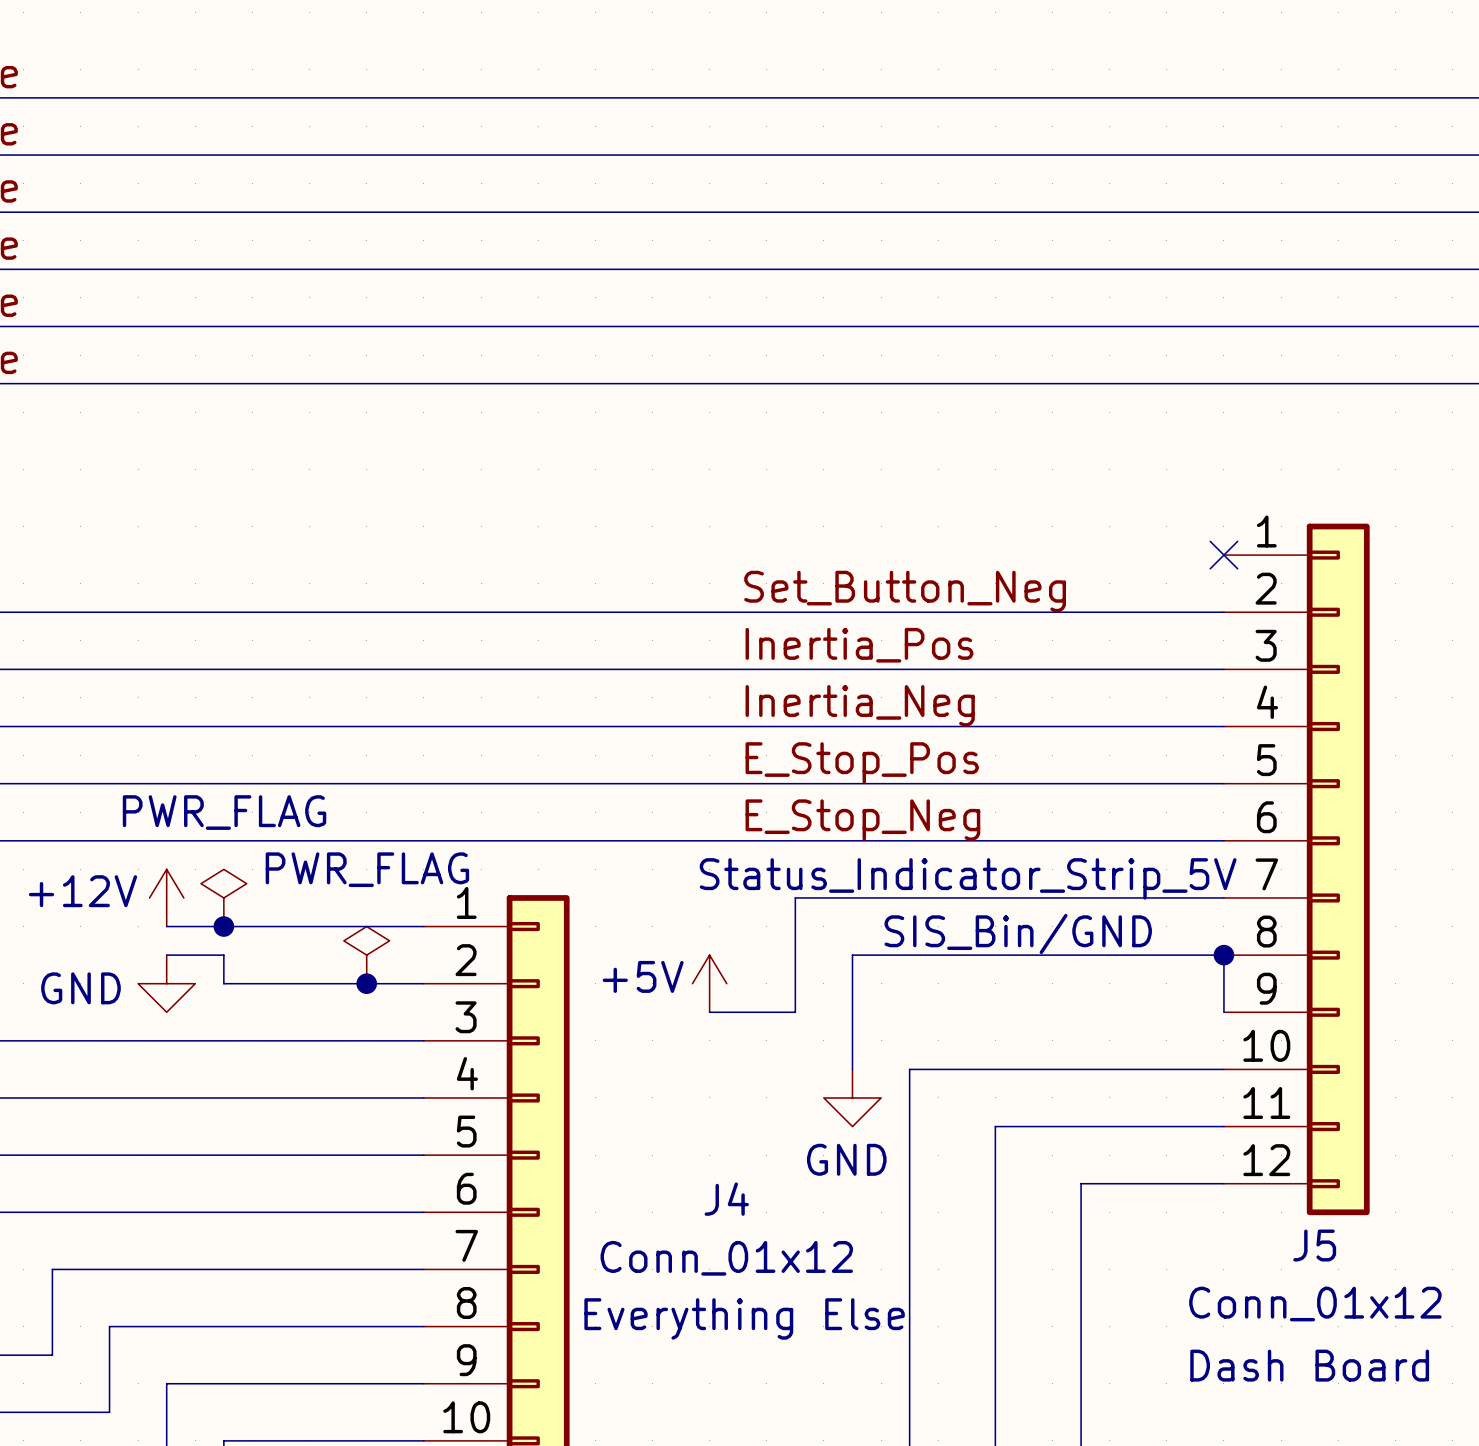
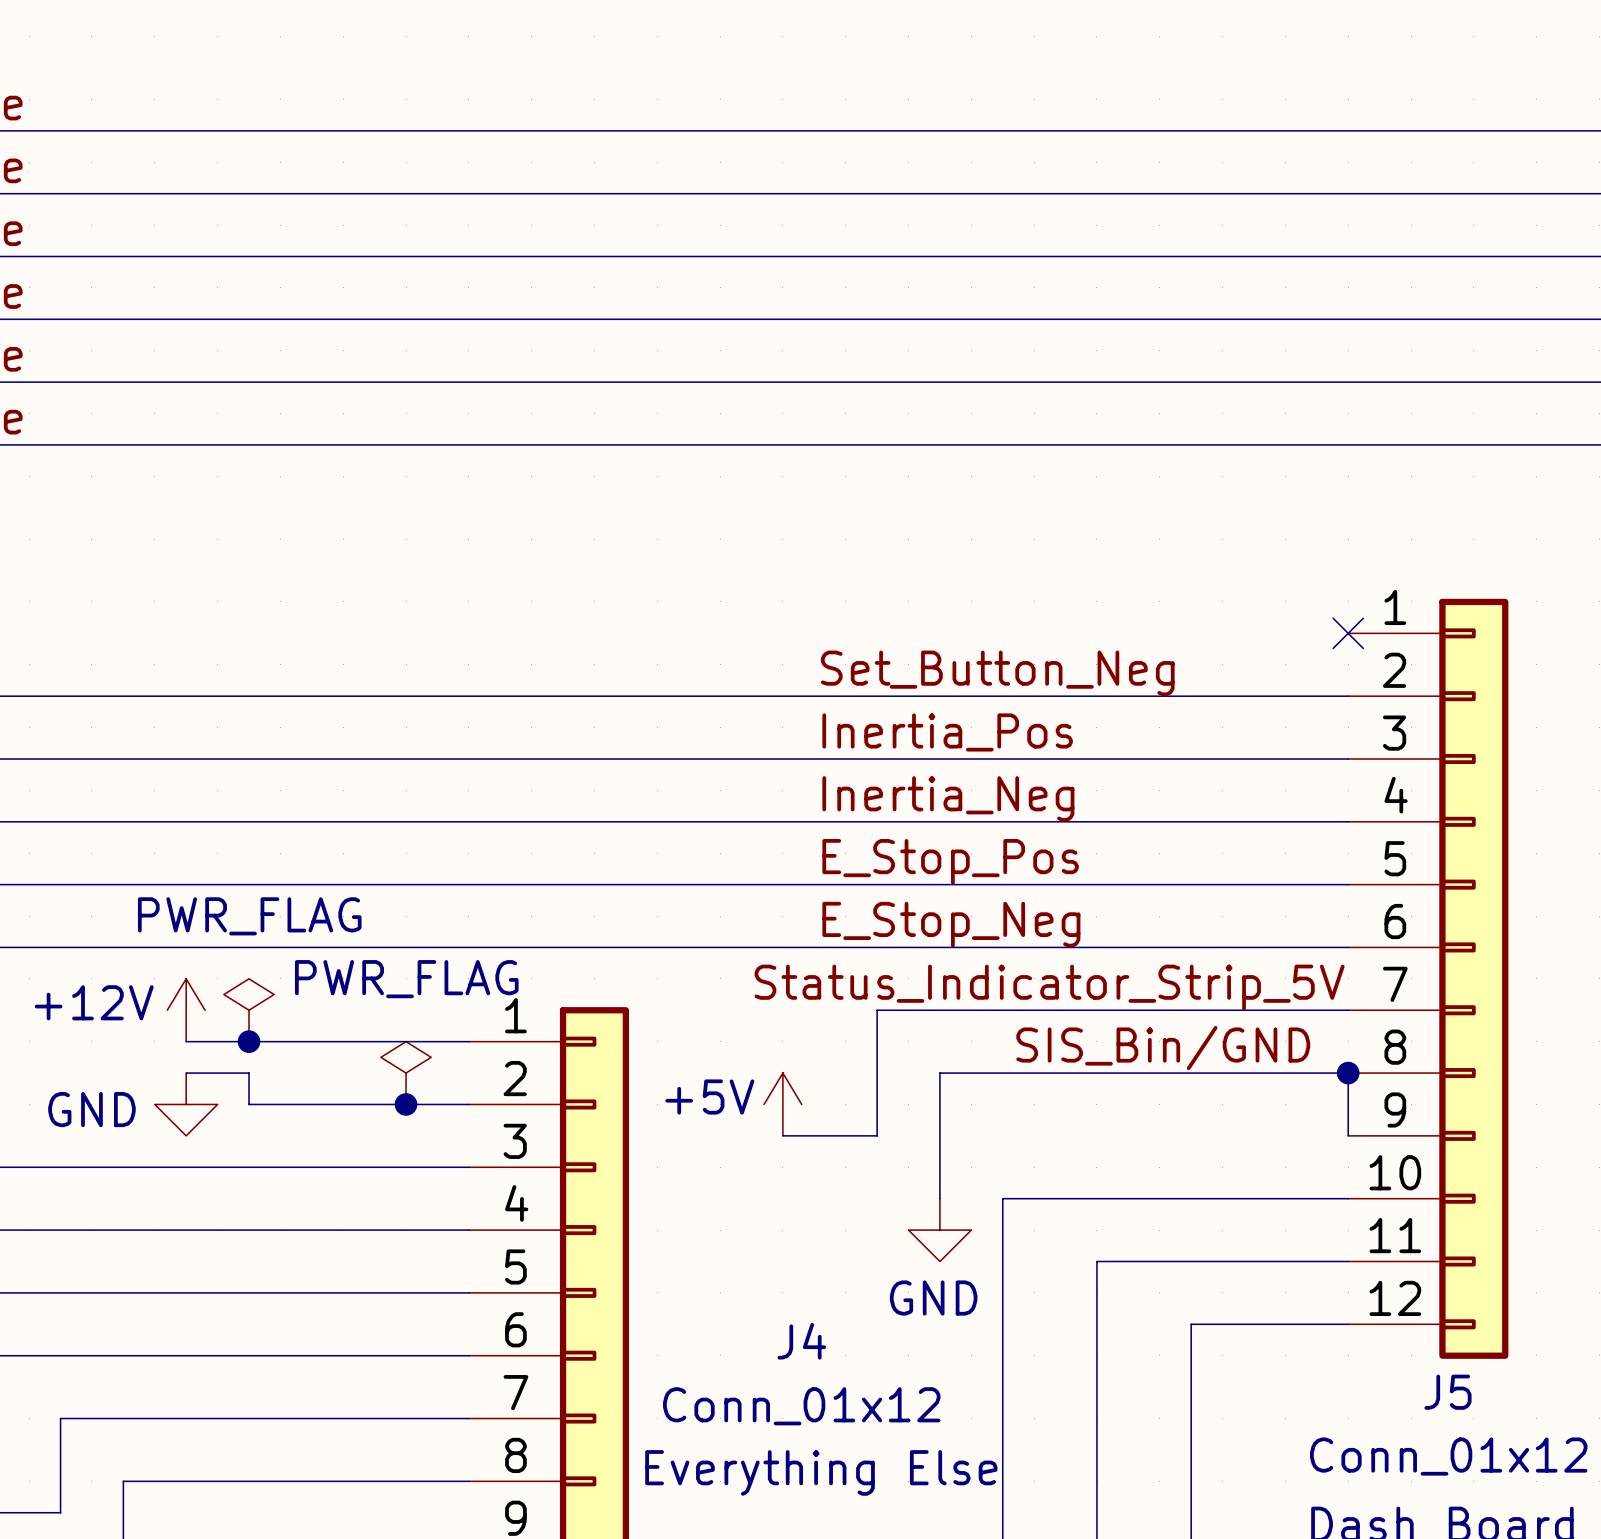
label: none -> Status_Indicator_Strip_5V (1049, 987)
text: Status_Indicator_Strip_5V (968, 878) -> none
label: none -> SIS_Bin/GND (1163, 1048)
text: SIS_Bin/GND (1018, 934) -> none

